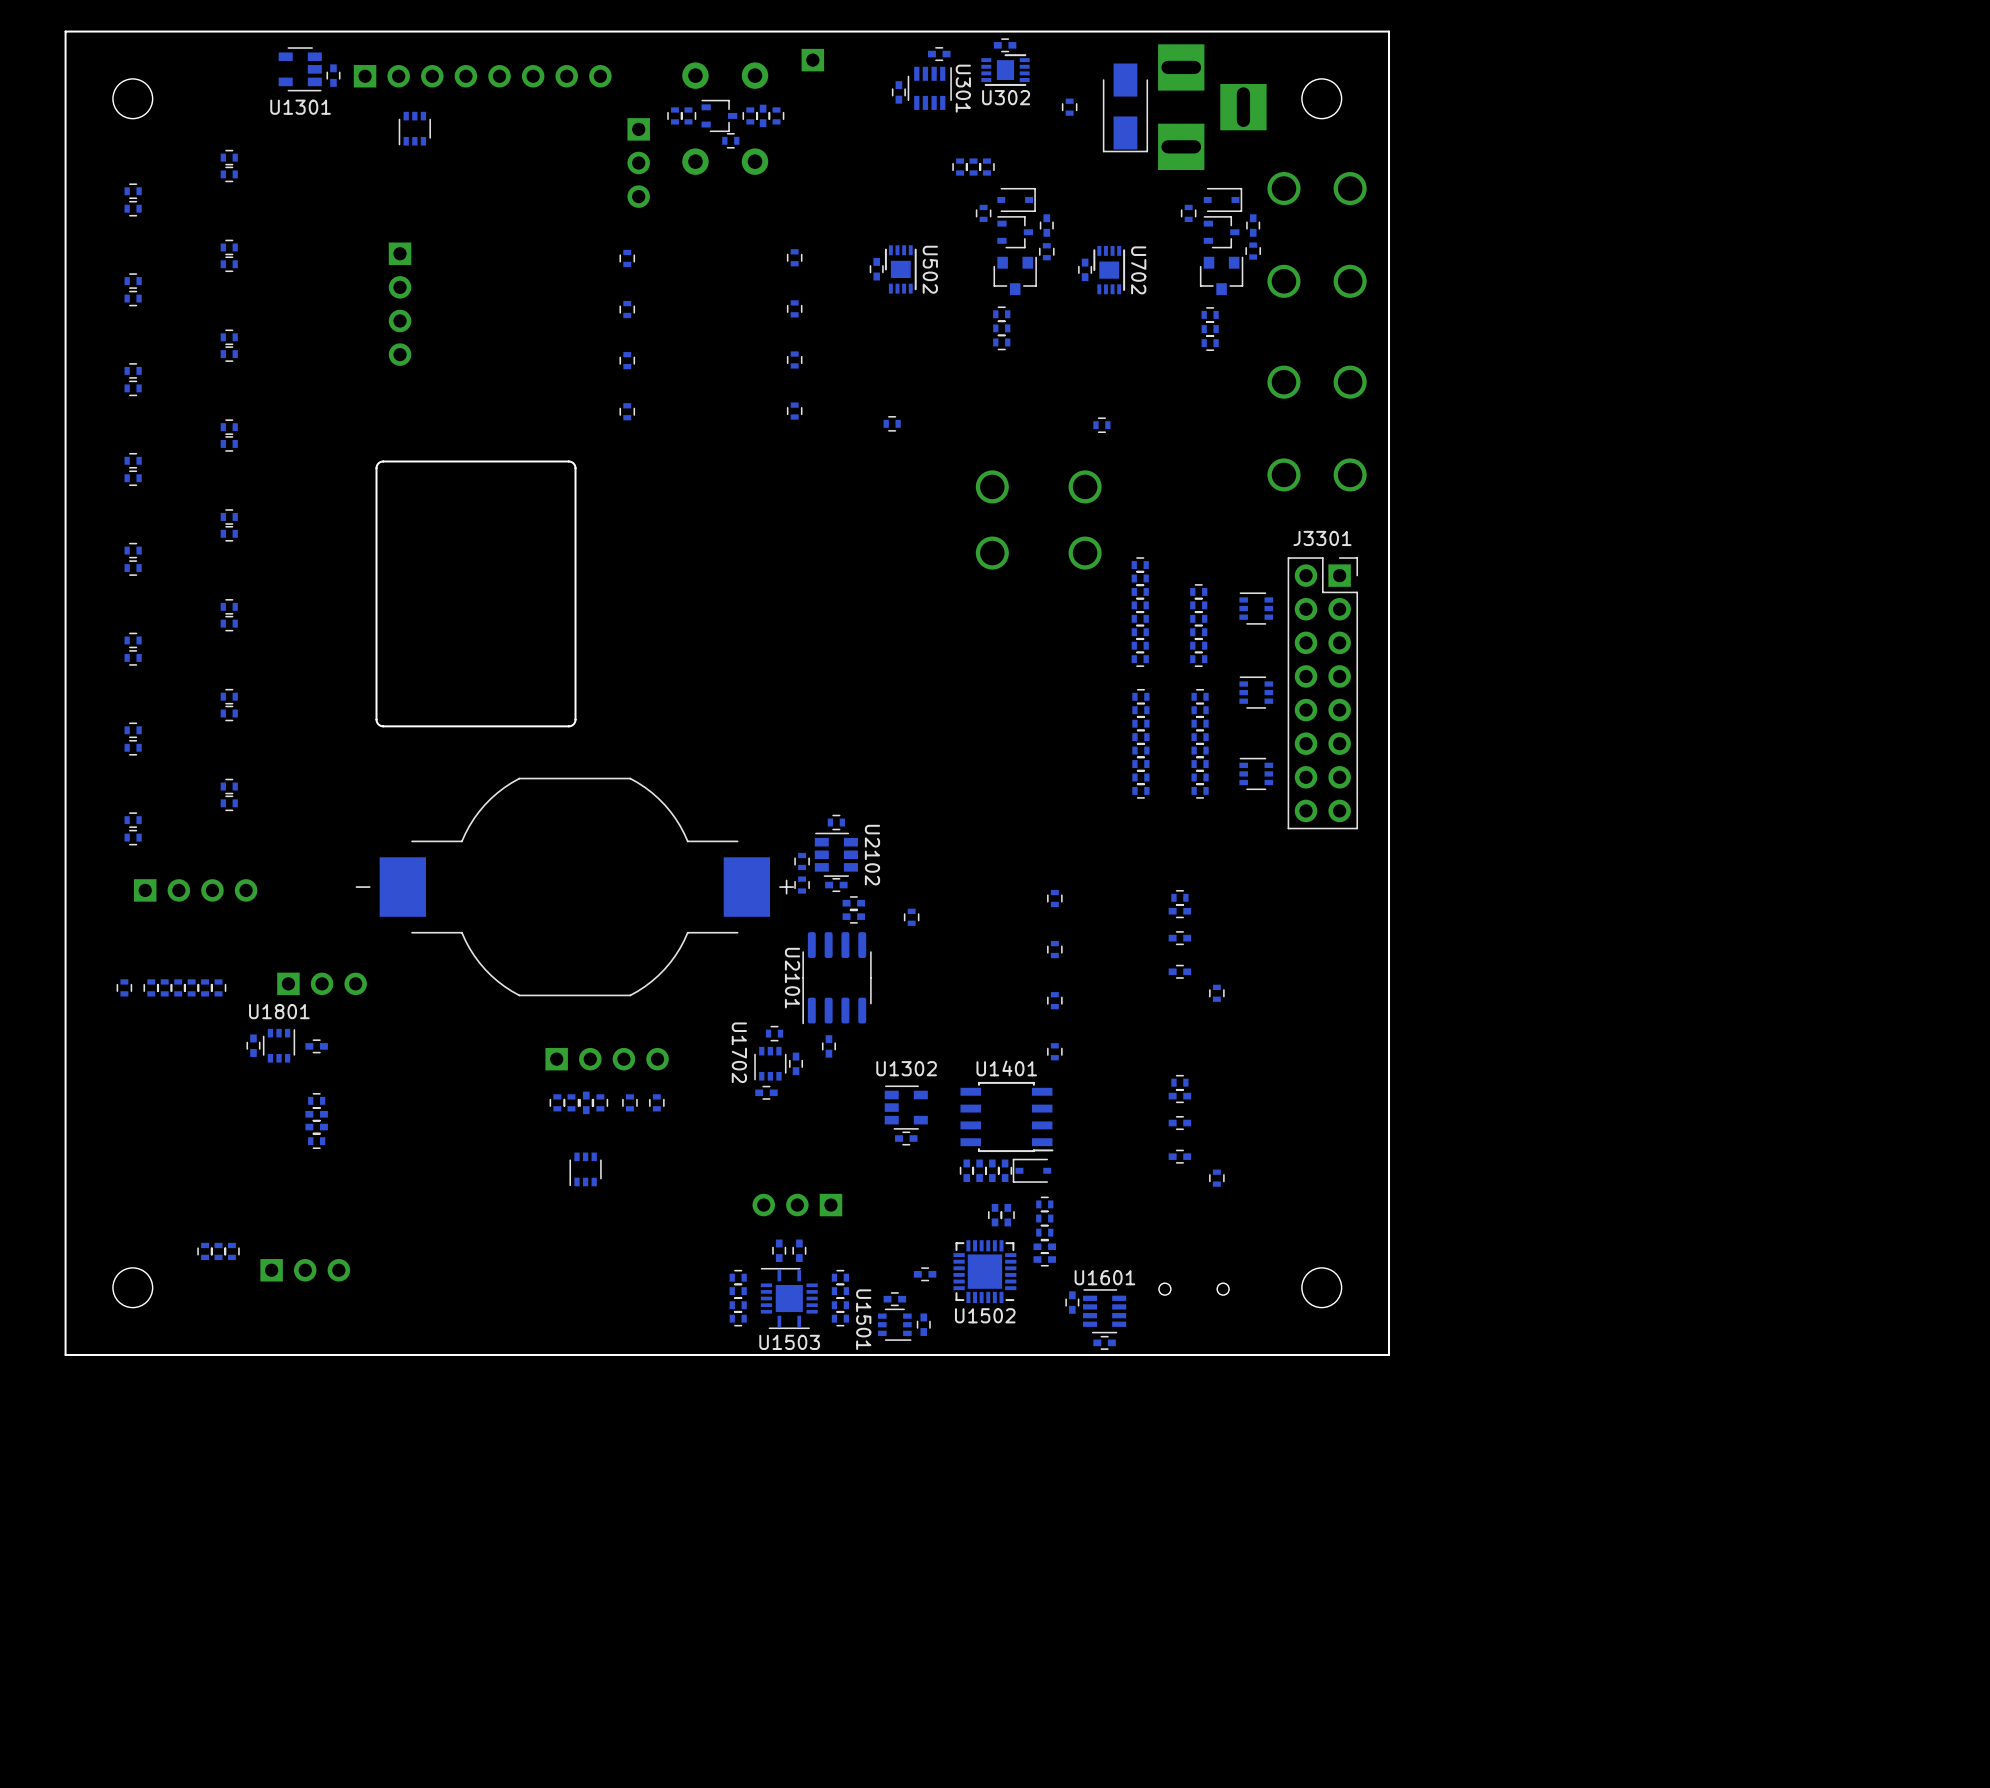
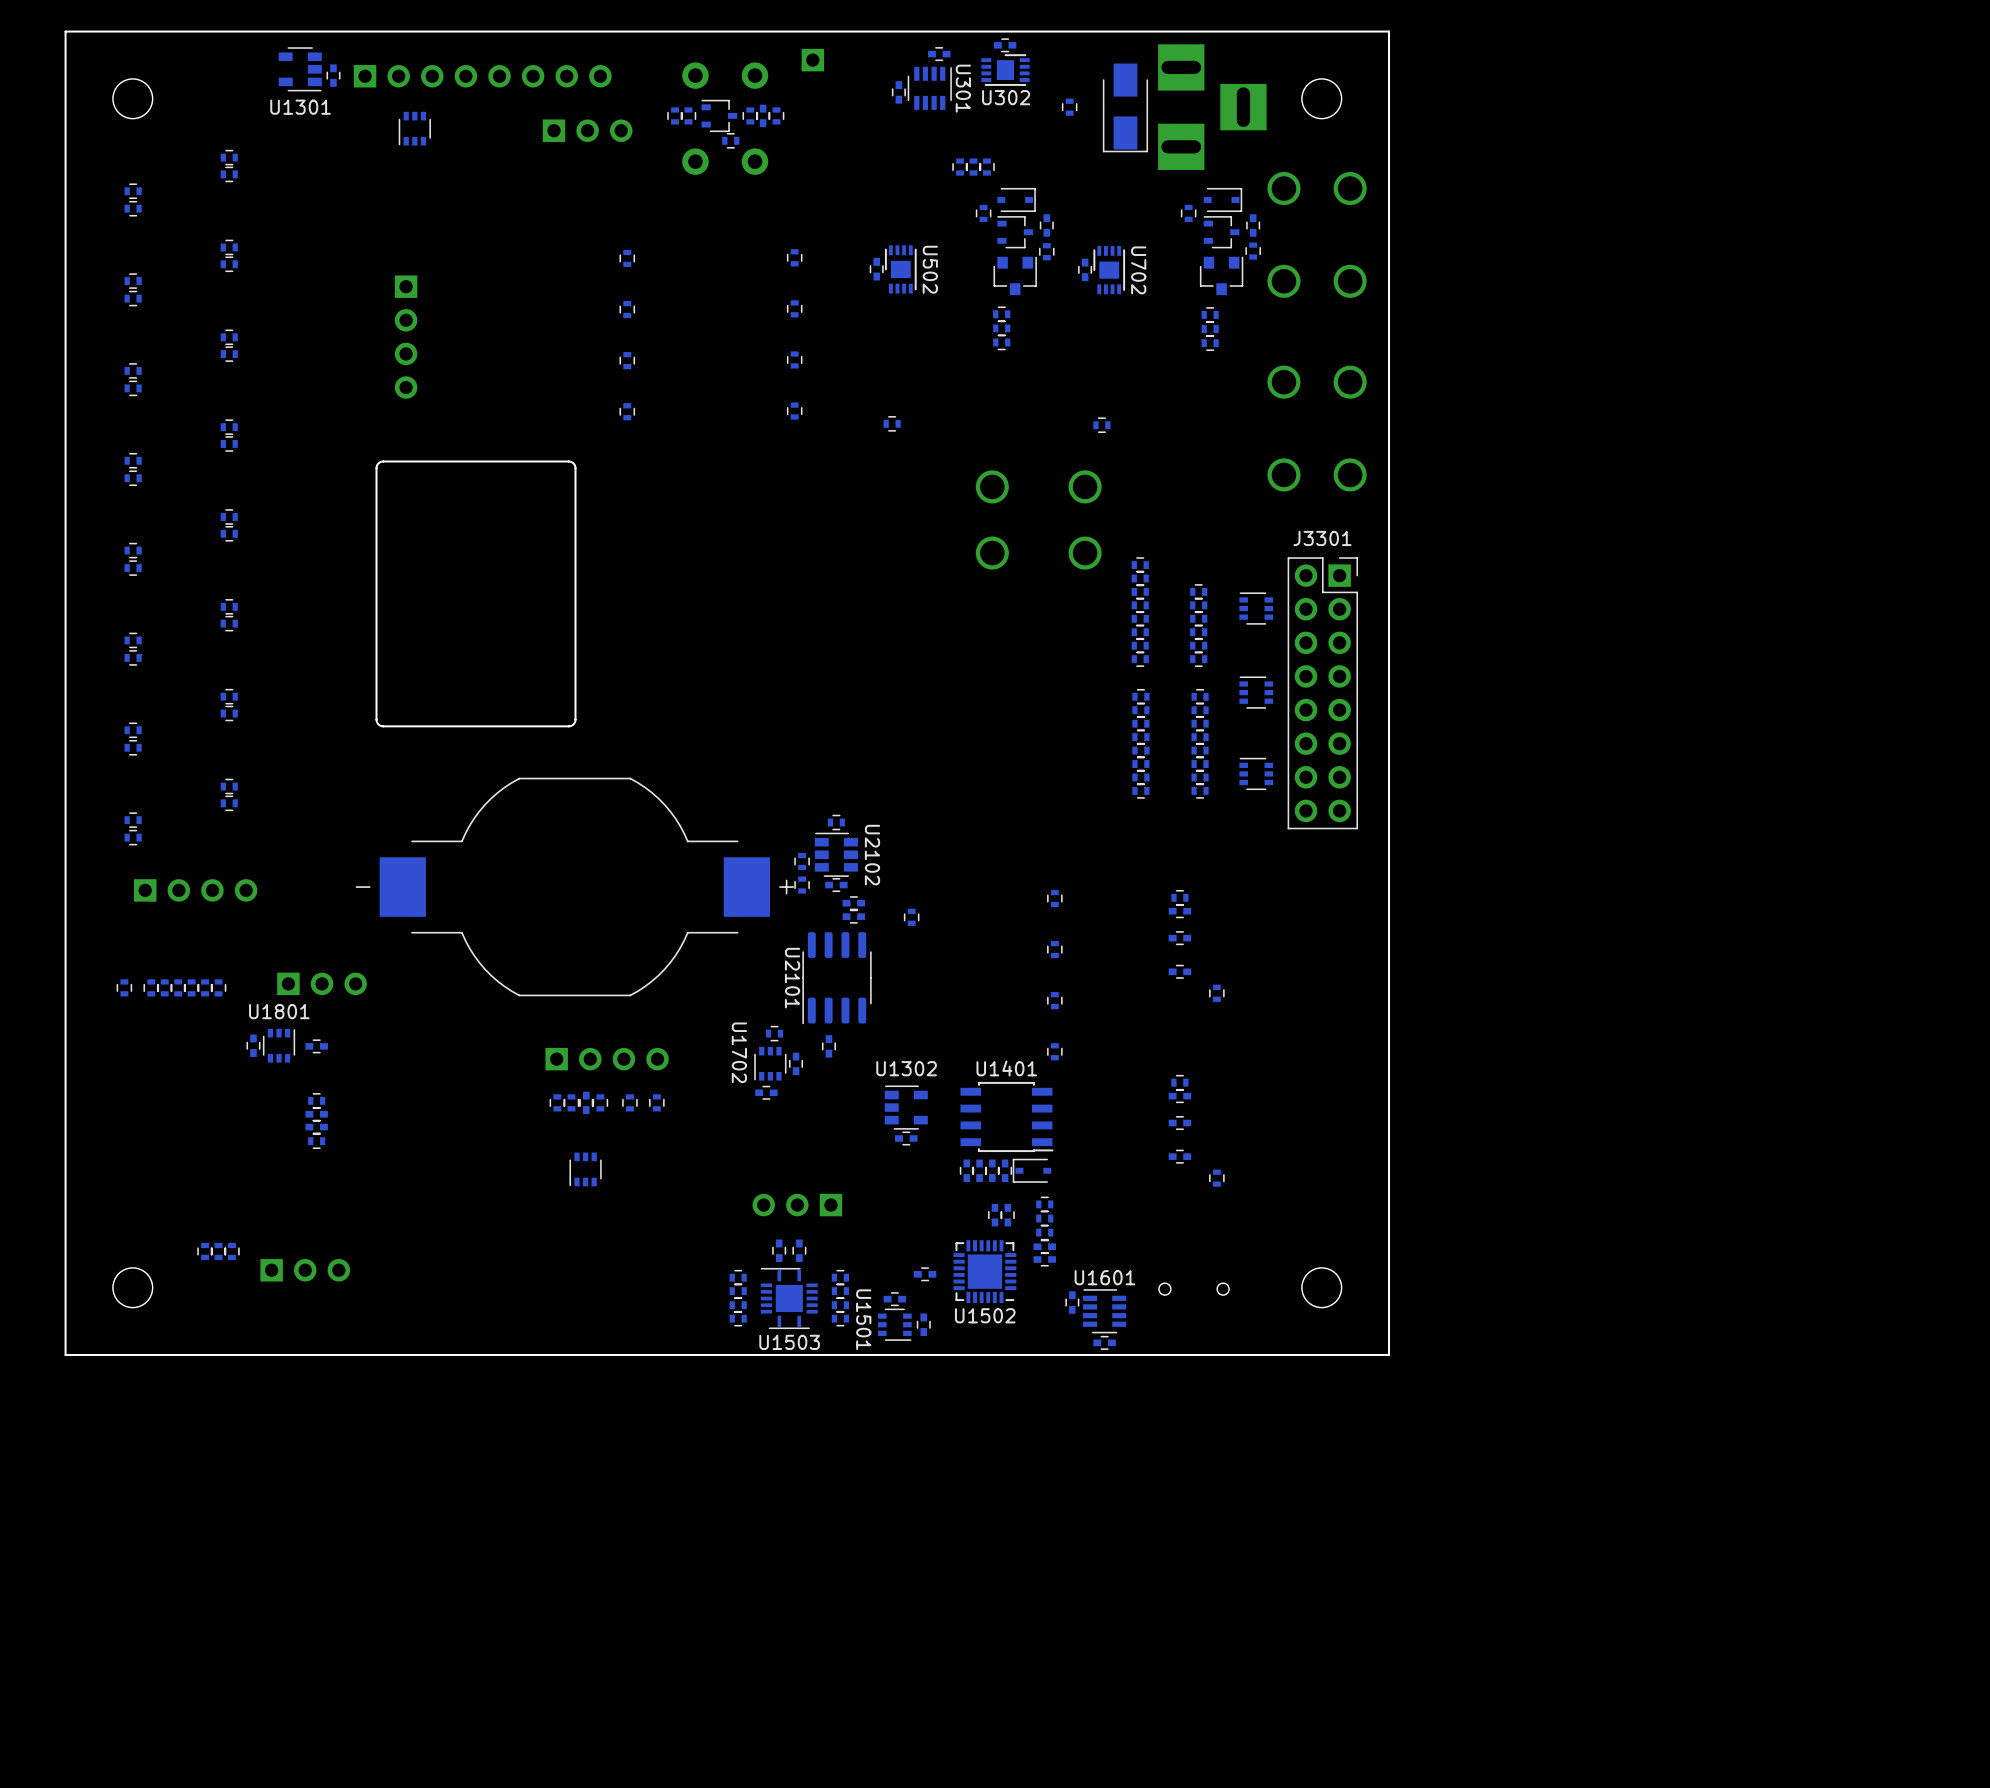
part rotation: 0° (638, 162) -> 90° counterclockwise (587, 130)
part position: (638, 162) -> (587, 130)
part position: (400, 304) -> (406, 337)

